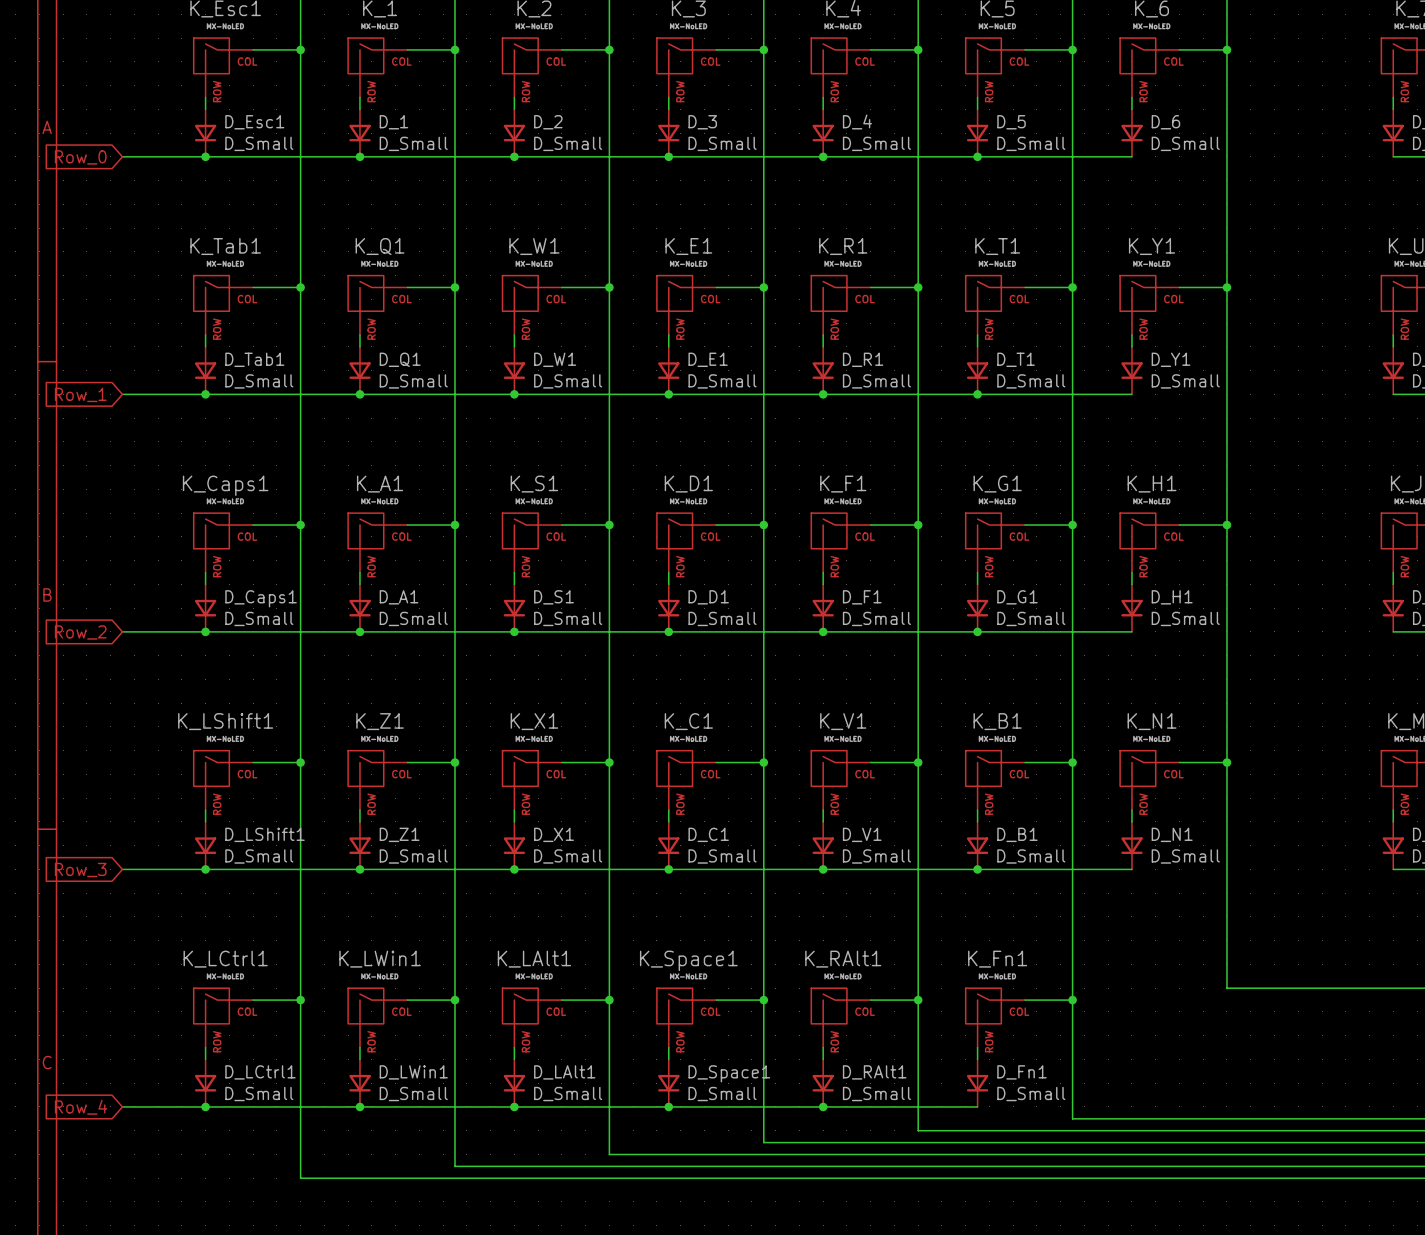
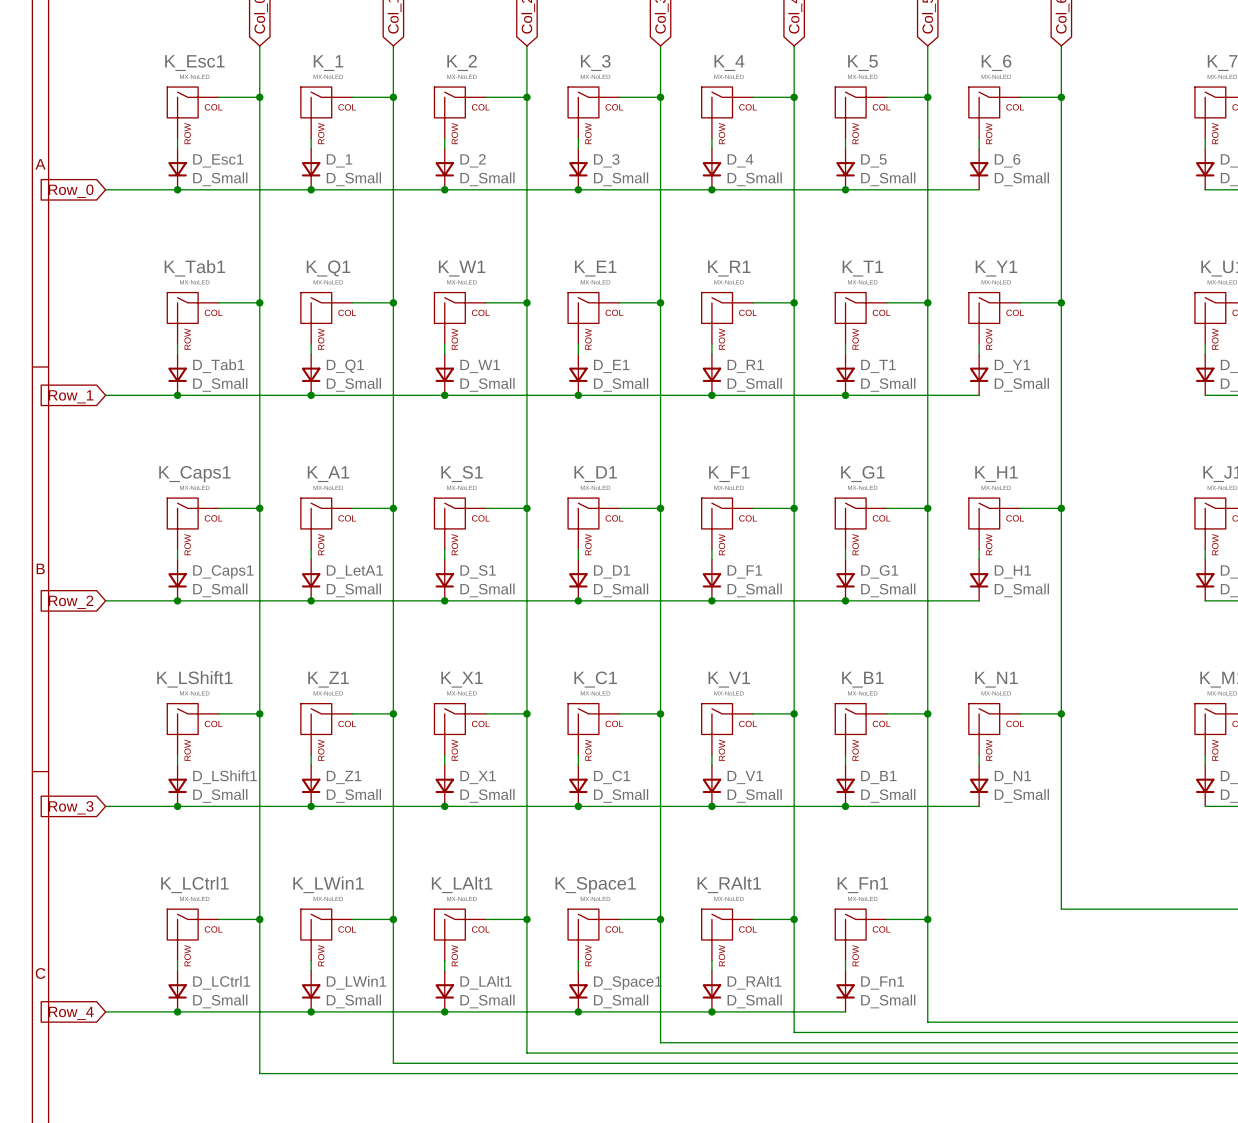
D_A1 name: D_A1 (399, 597) -> D_LetA1 (354, 571)

